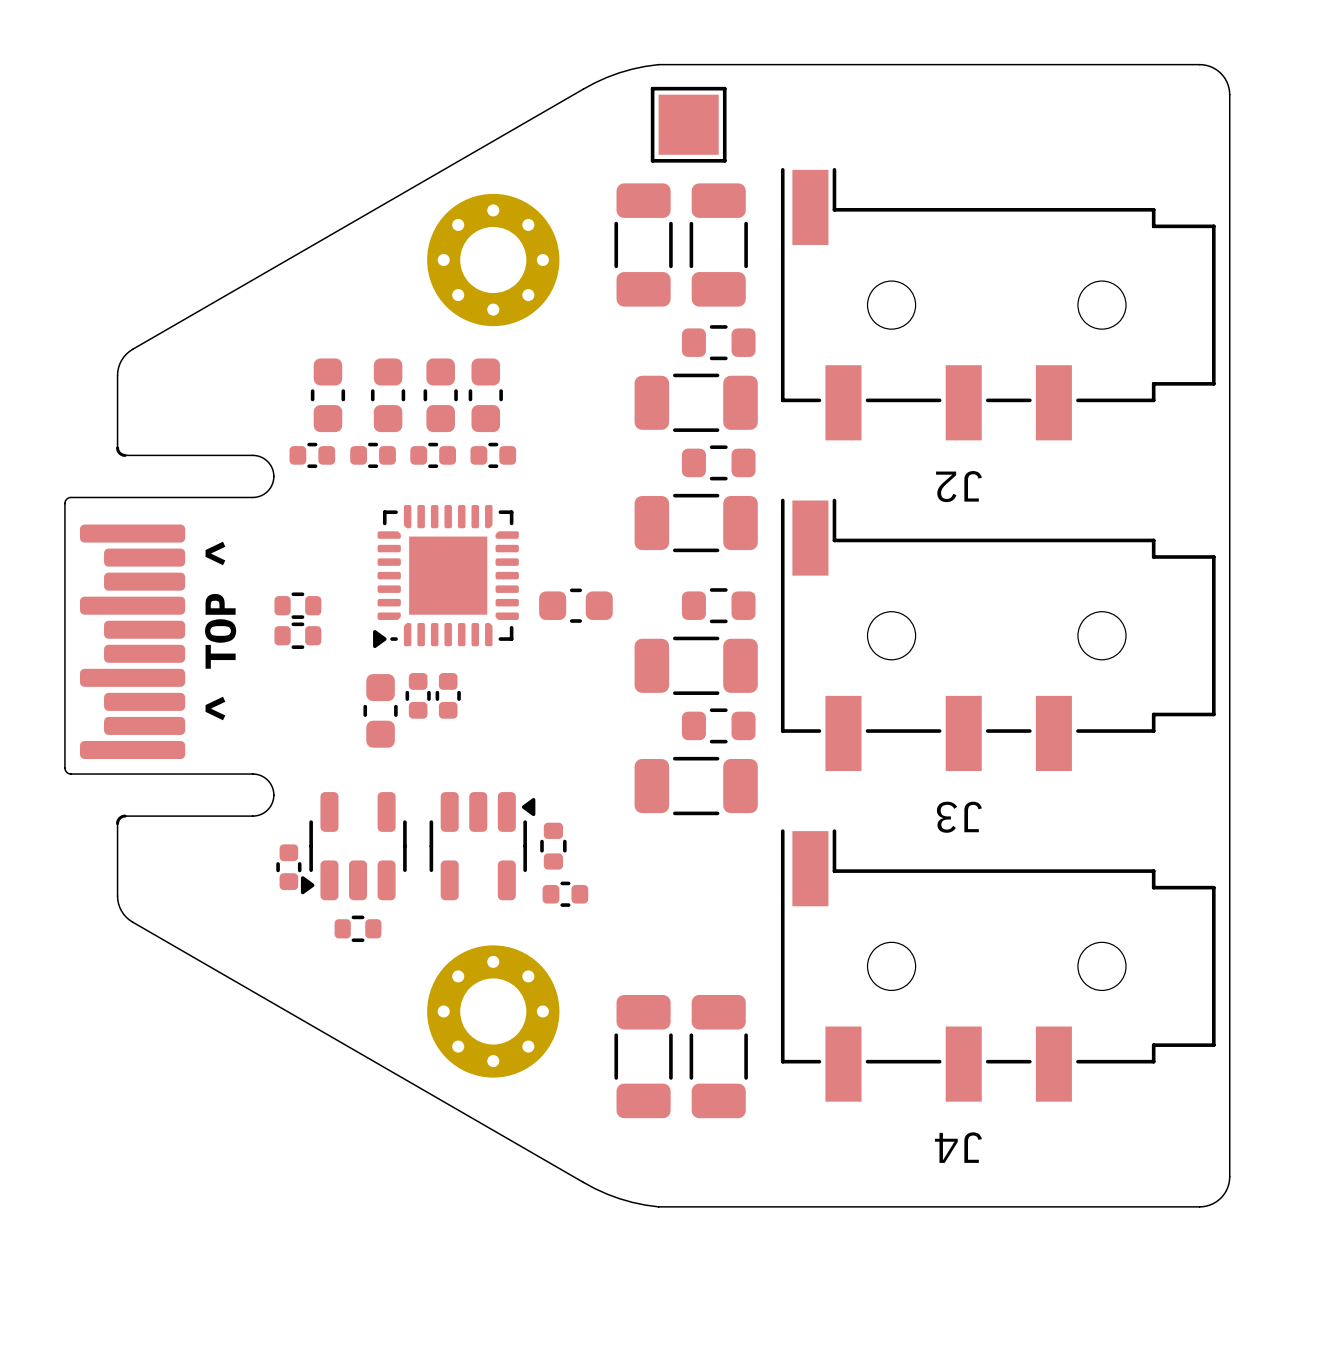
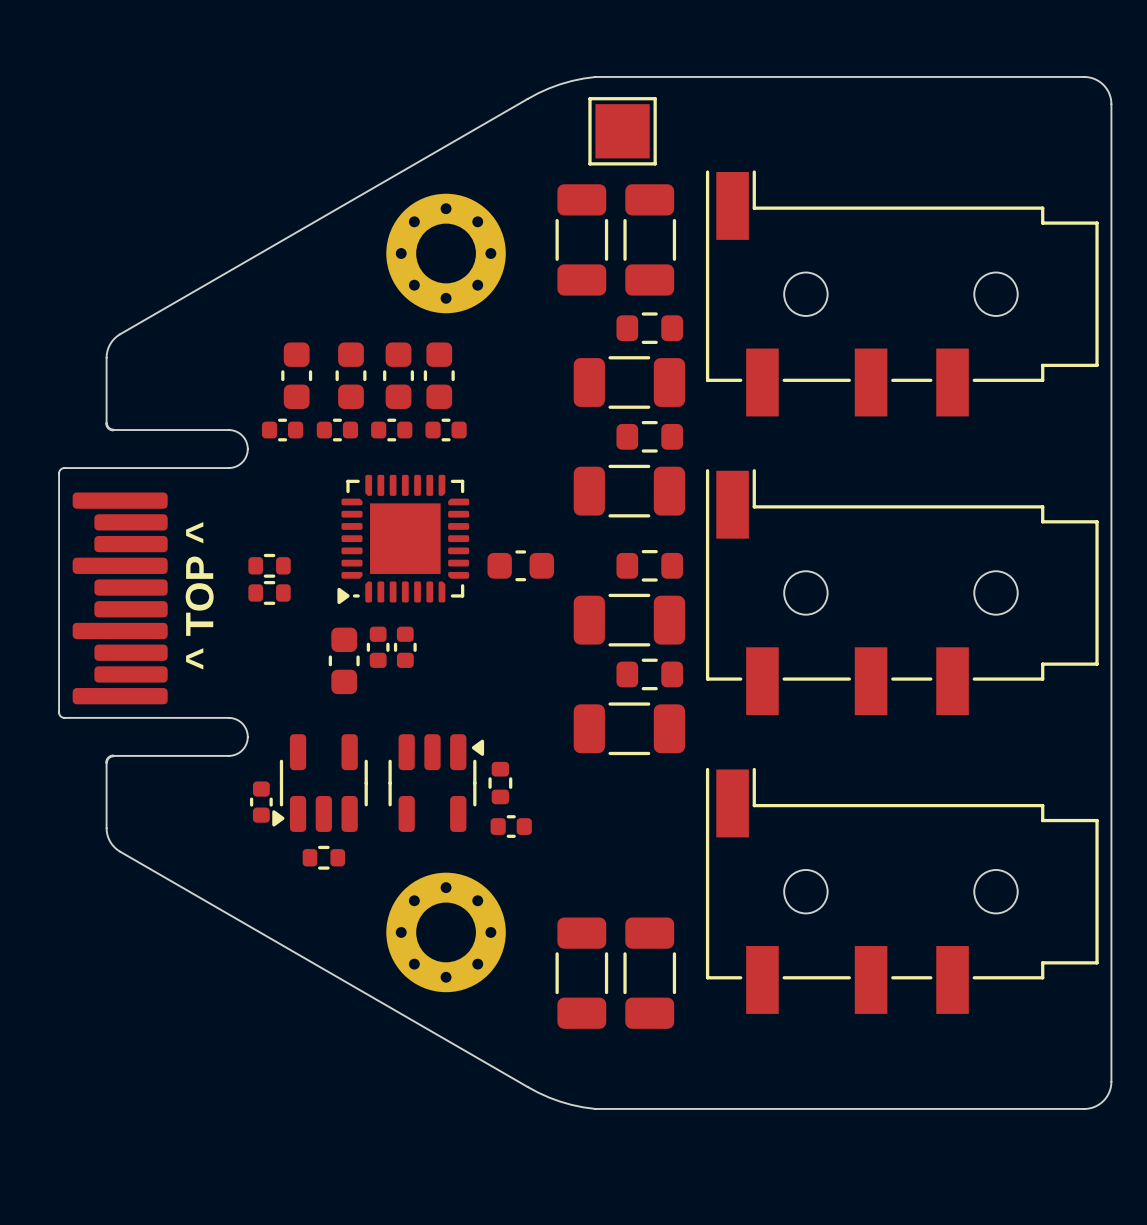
J2 name: J2 (958, 486) -> none
J3 name: J3 (959, 817) -> none
J4 name: J4 (958, 1147) -> none

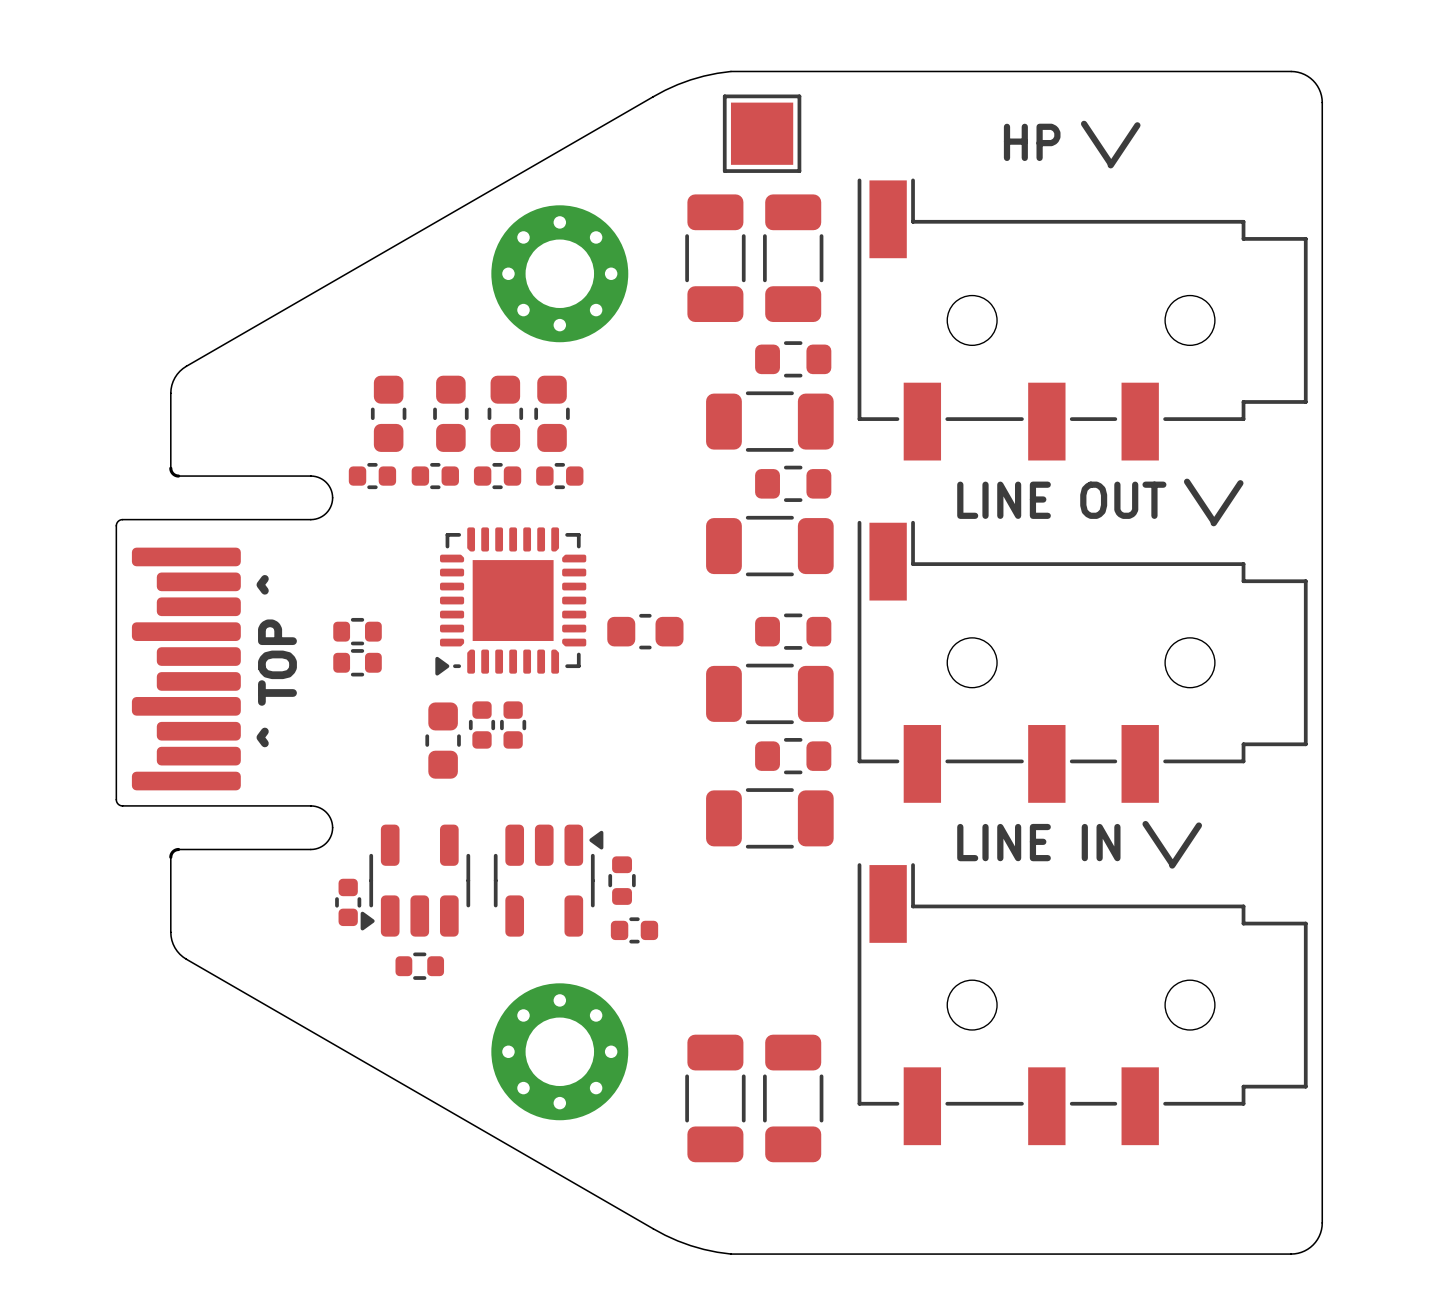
text: none -> HP \/ (1072, 144)
text: none -> LINE OUT \/ (1100, 502)
text: none -> LINE IN \/ (1079, 844)

